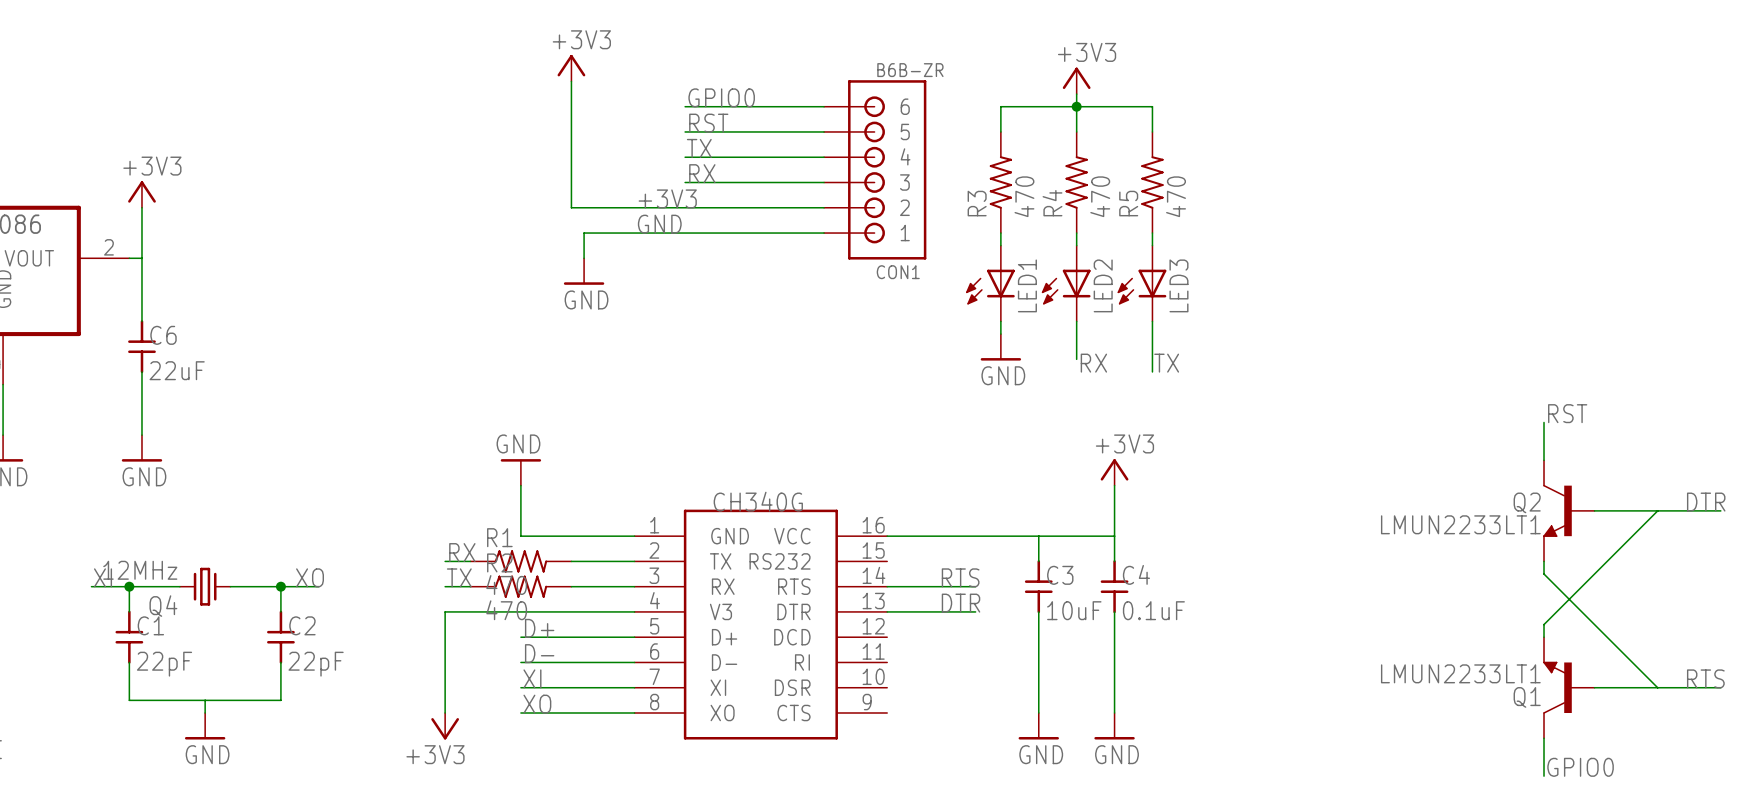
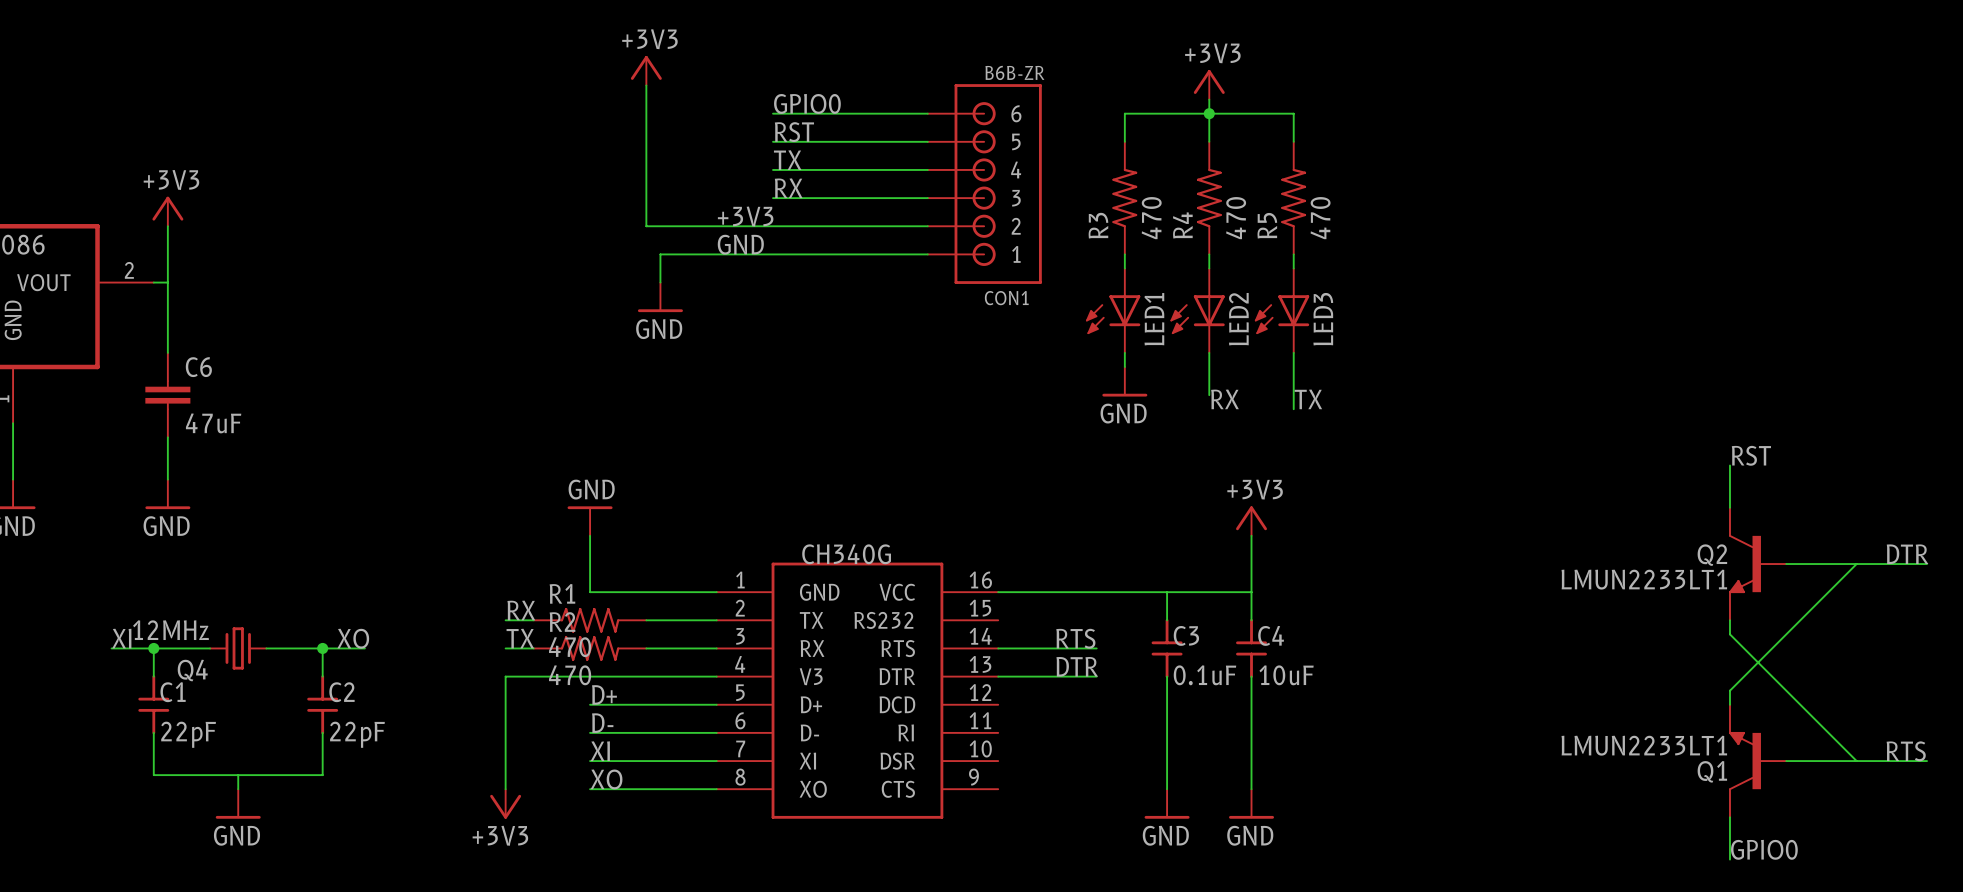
C6 symbol: [128, 320, 156, 374] -> [145, 352, 191, 438]
C6 value: 22uF (177, 370) -> 47uF (213, 423)
C3 value: 10uF (1074, 610) -> 0.1uF (1204, 675)
C4 value: 0.1uF (1153, 610) -> 10uF (1286, 675)

